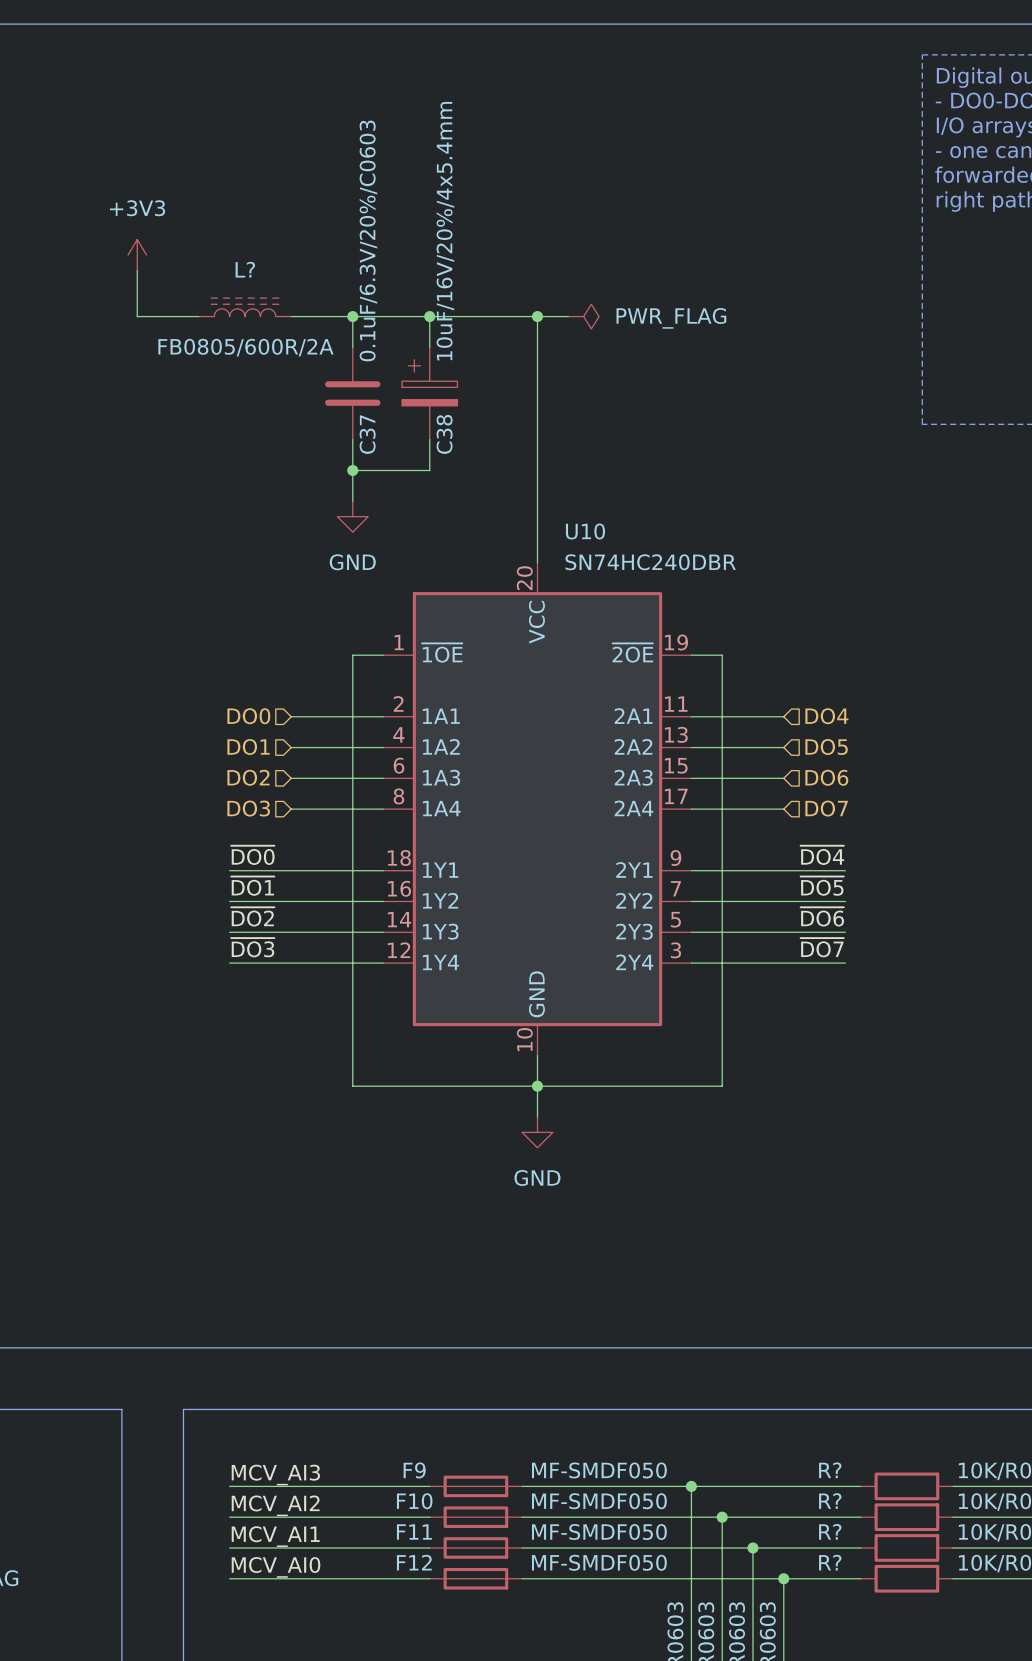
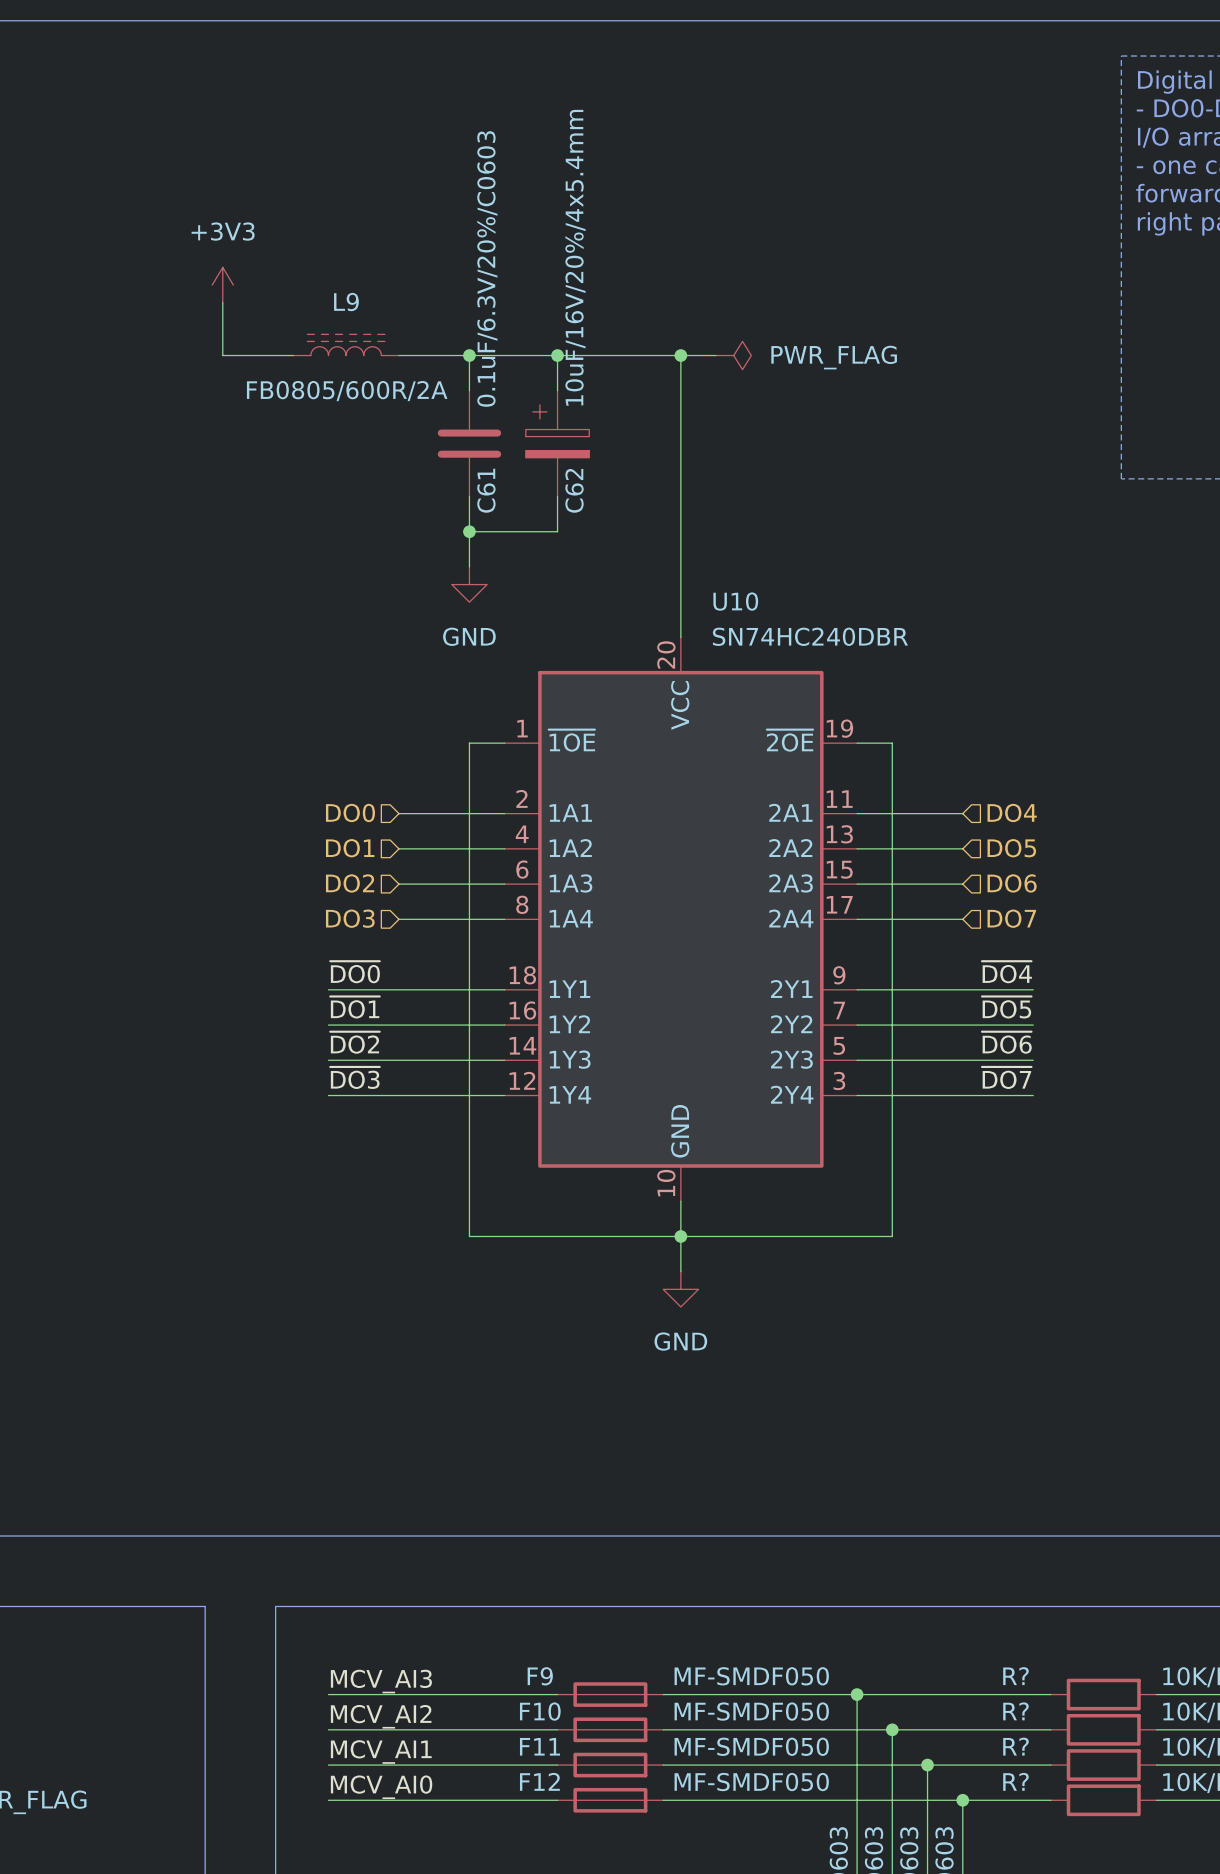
L? name: L? (245, 269) -> L9 (346, 302)
C37 name: C37 (367, 434) -> C61 (486, 490)
C38 name: C38 (444, 434) -> C62 (574, 490)

